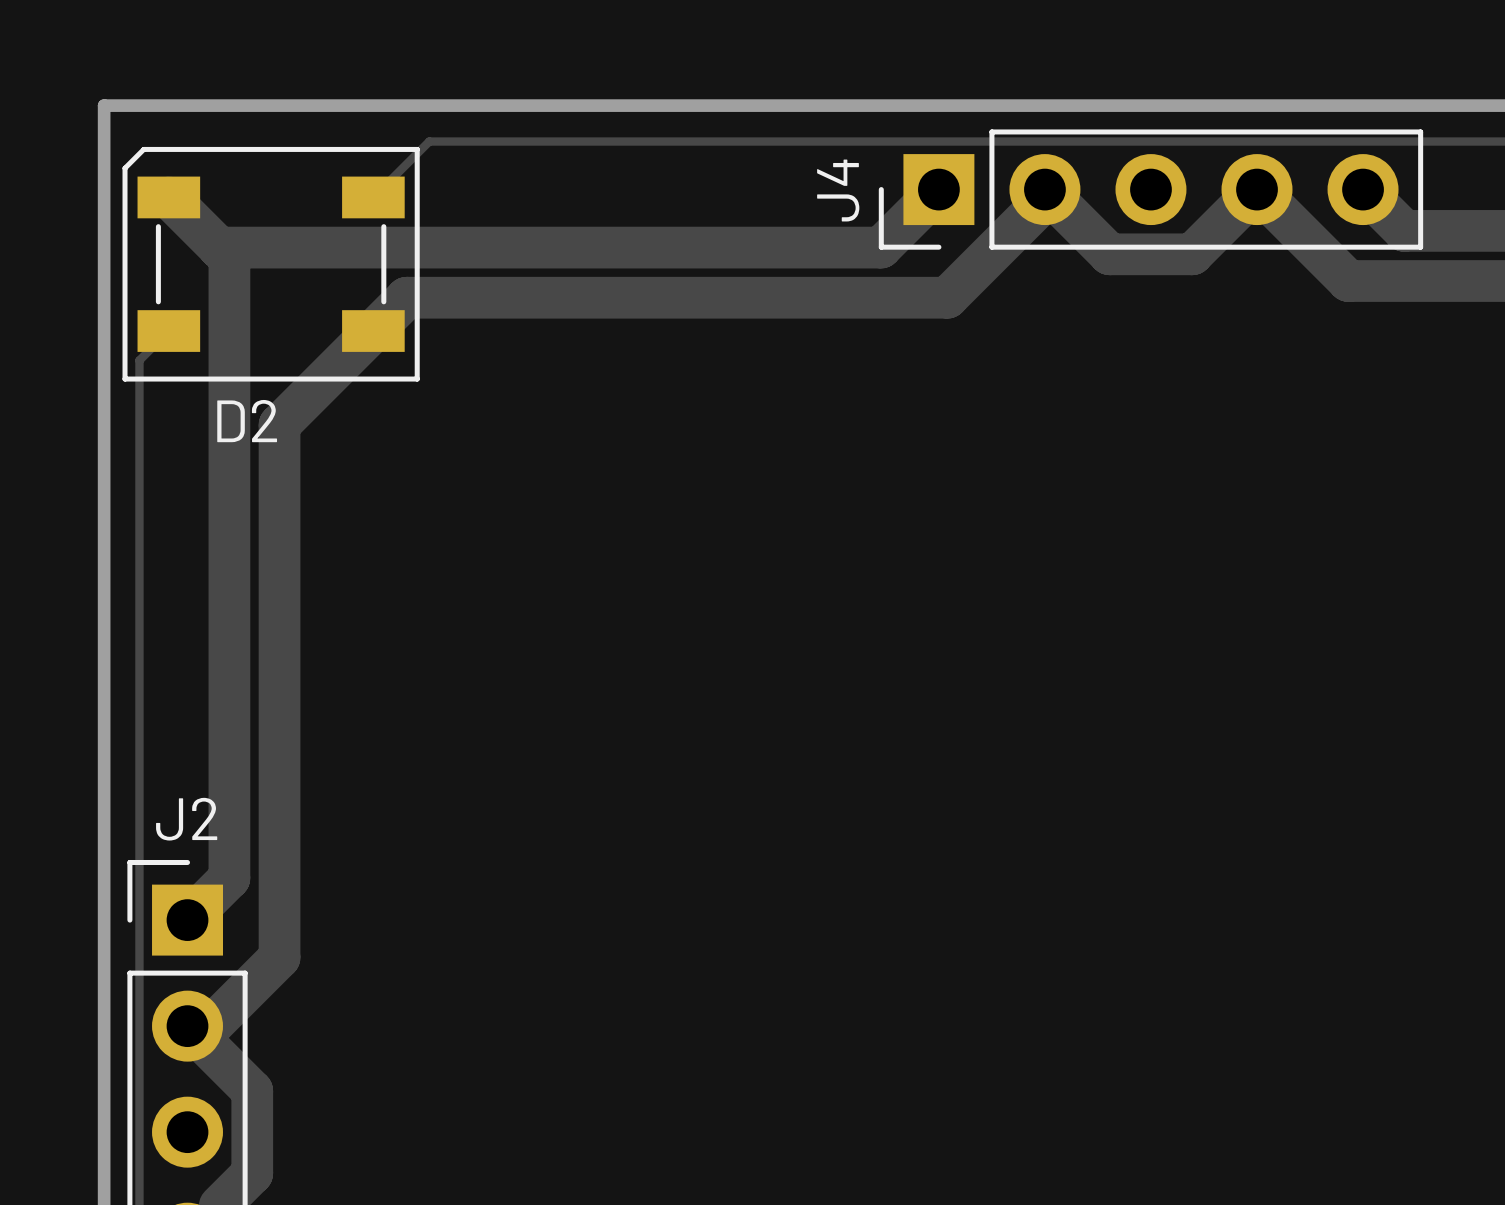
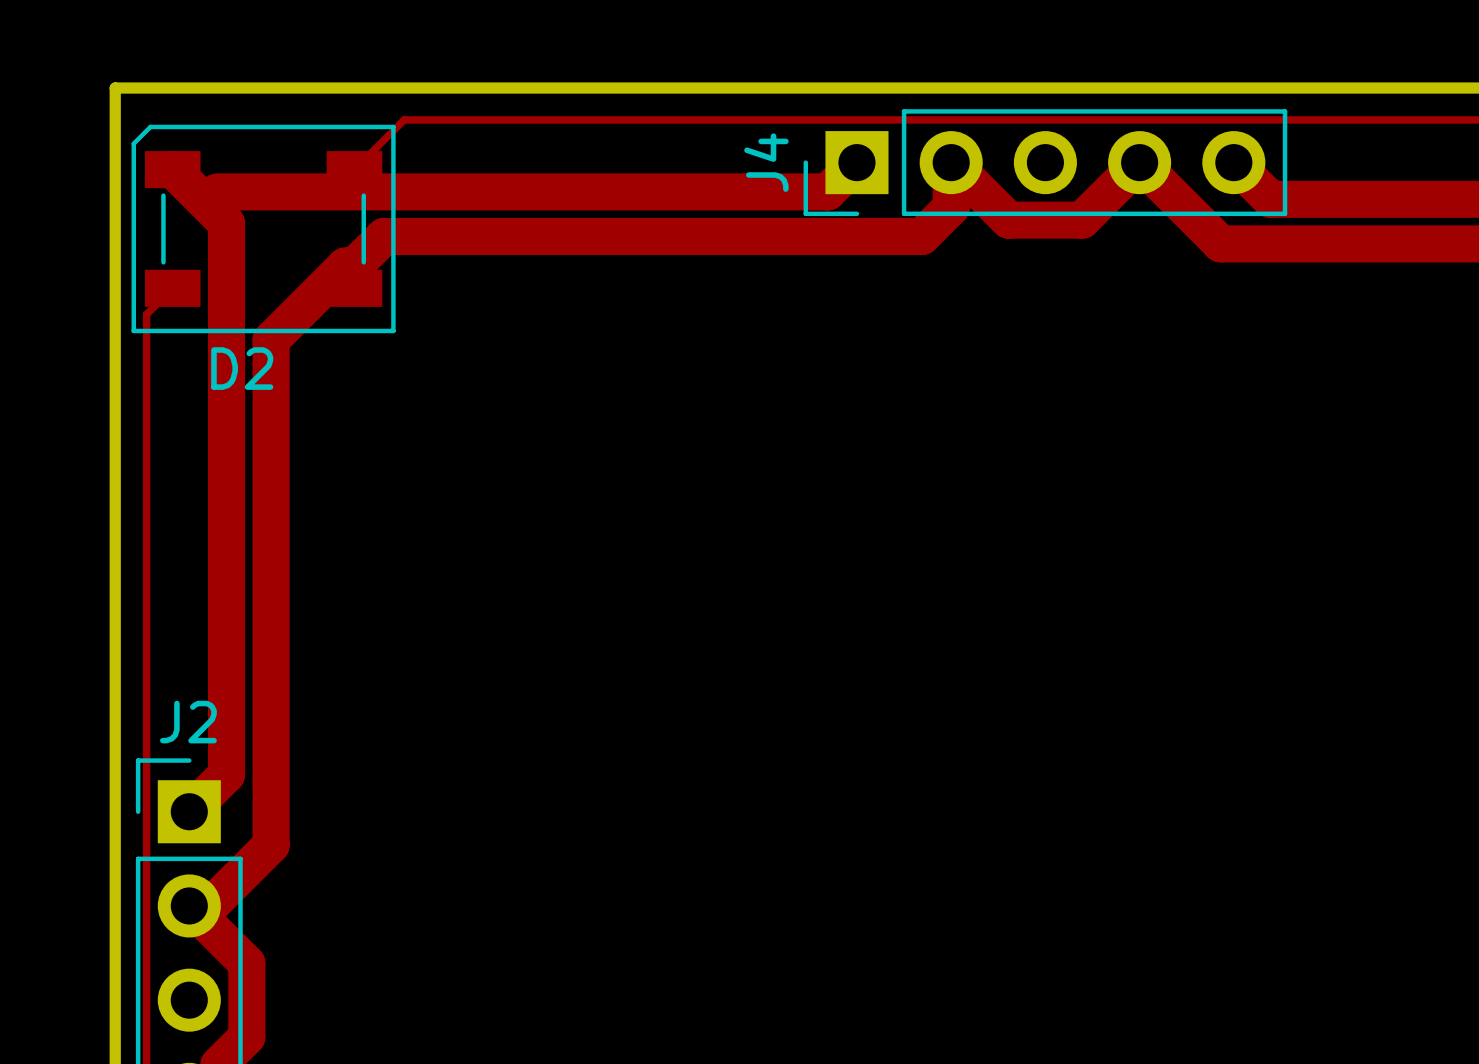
track: (1044, 200) (947, 297) (406, 297) (279, 424) -> (951, 171) (951, 207) (921, 236) (384, 236) (354, 266) (345, 266) (271, 340) (271, 371)
track: (905, 222) (880, 247) (218, 247) -> (827, 191) (217, 191)

